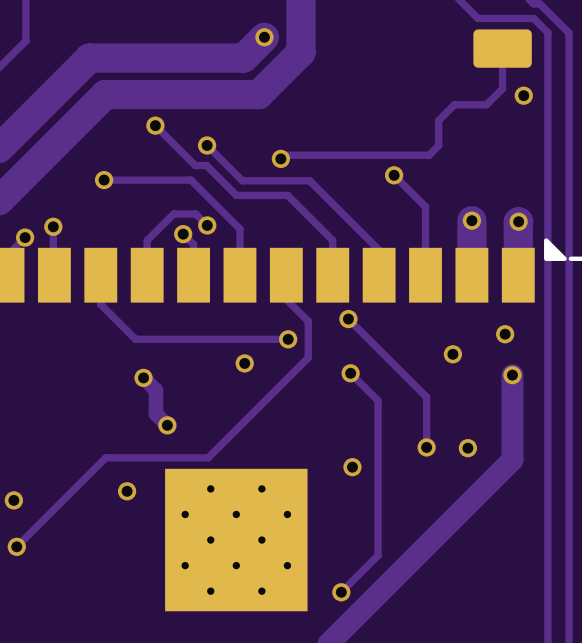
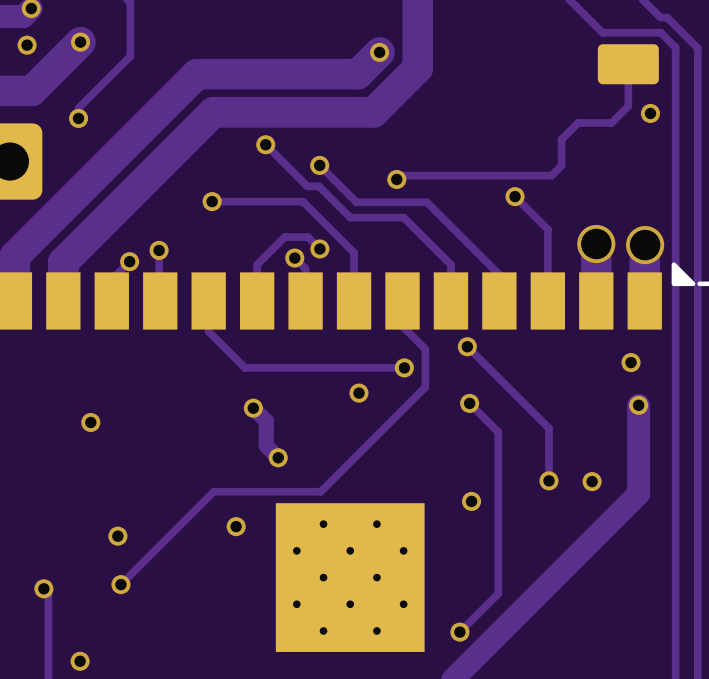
via size: [462, 211, 482, 230] -> [577, 224, 616, 264]
via size: [509, 212, 528, 231] -> [626, 226, 665, 265]
via: (452, 354) -> none

